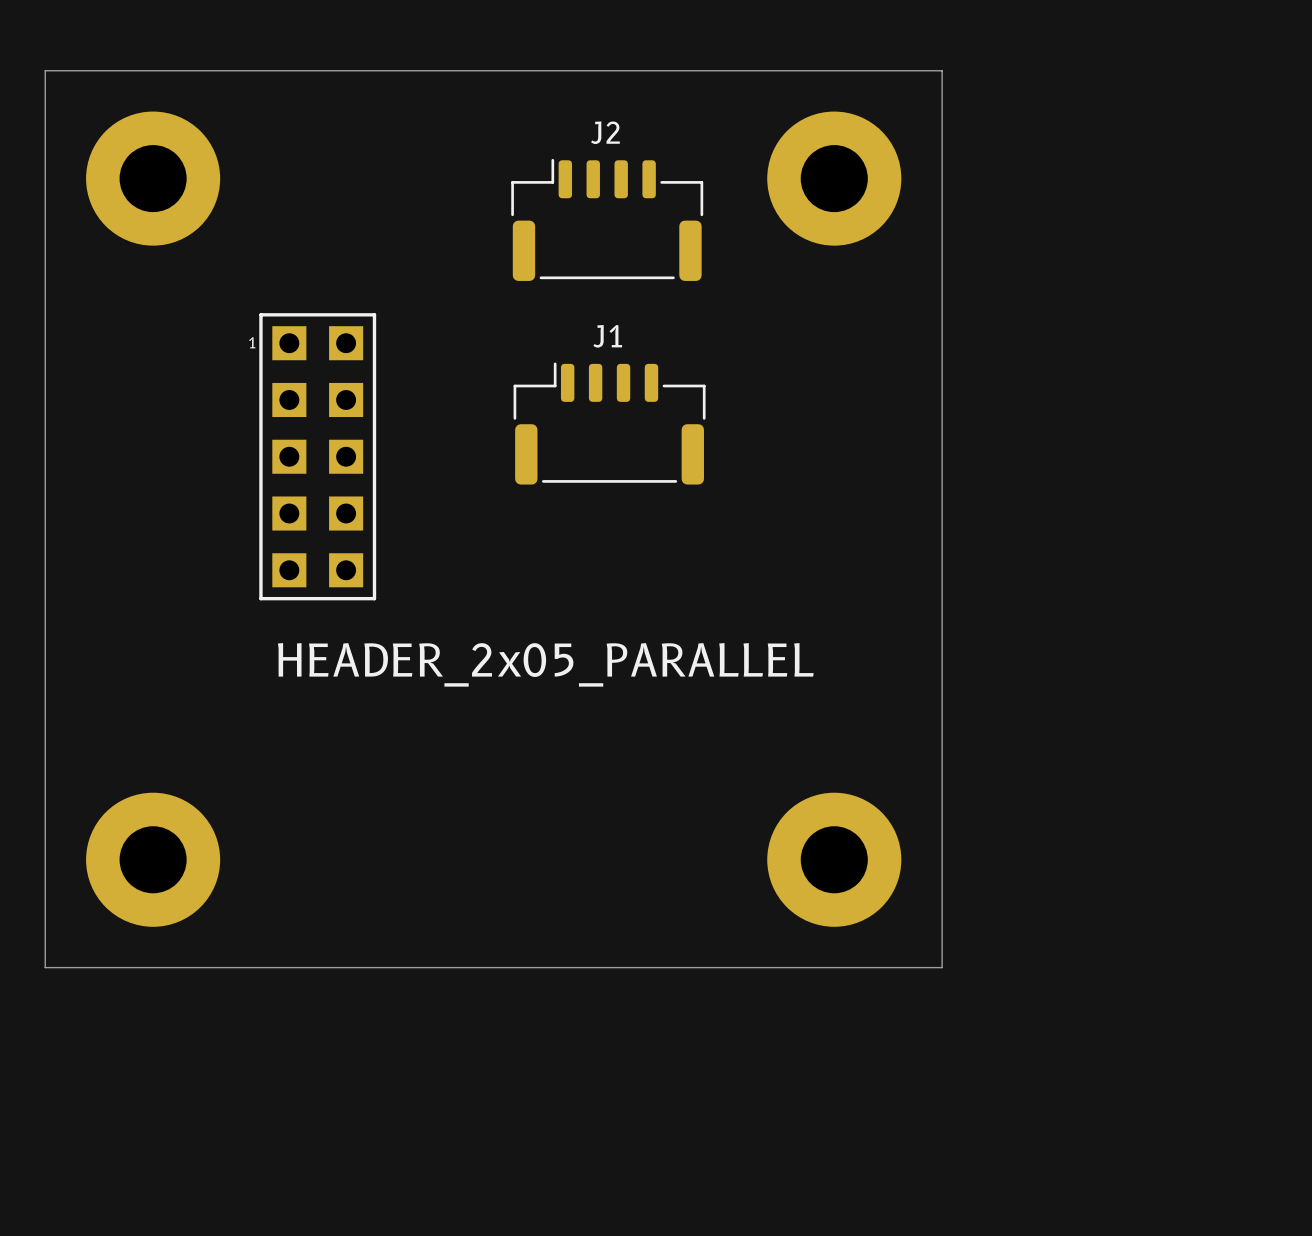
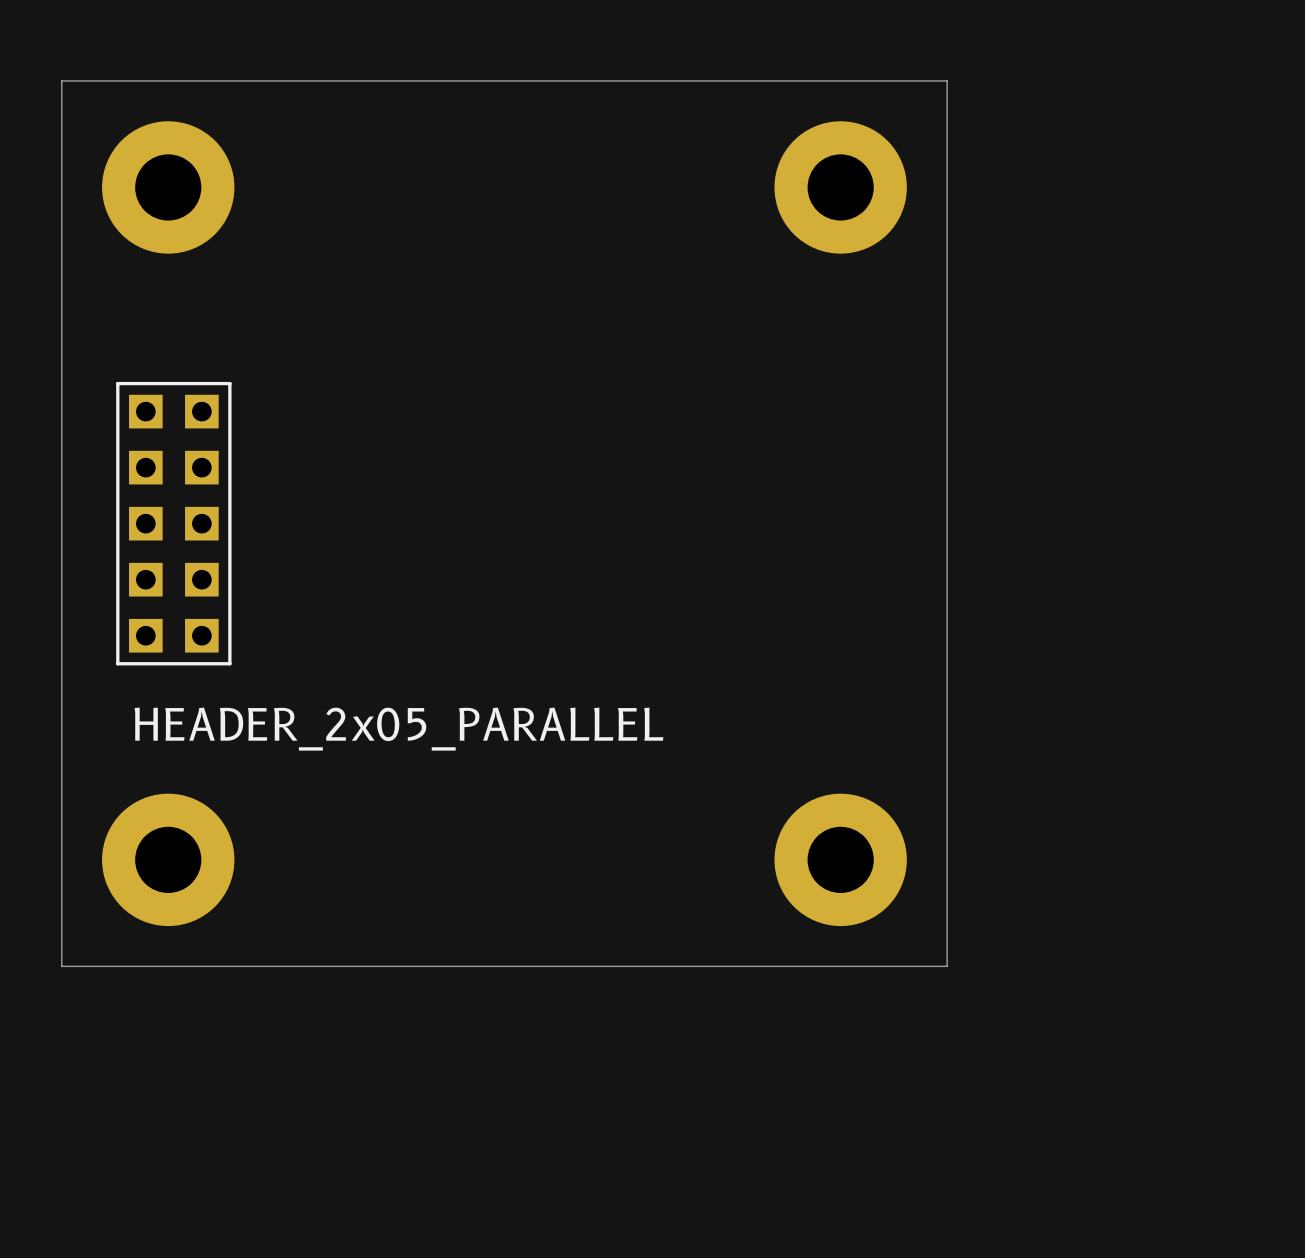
J2: (607, 219) -> none
J1: (609, 423) -> none
part: HEADER_2x05_PARALLEL (317, 456) -> none
part: none -> HEADER_2x05_PARALLEL (173, 523)

